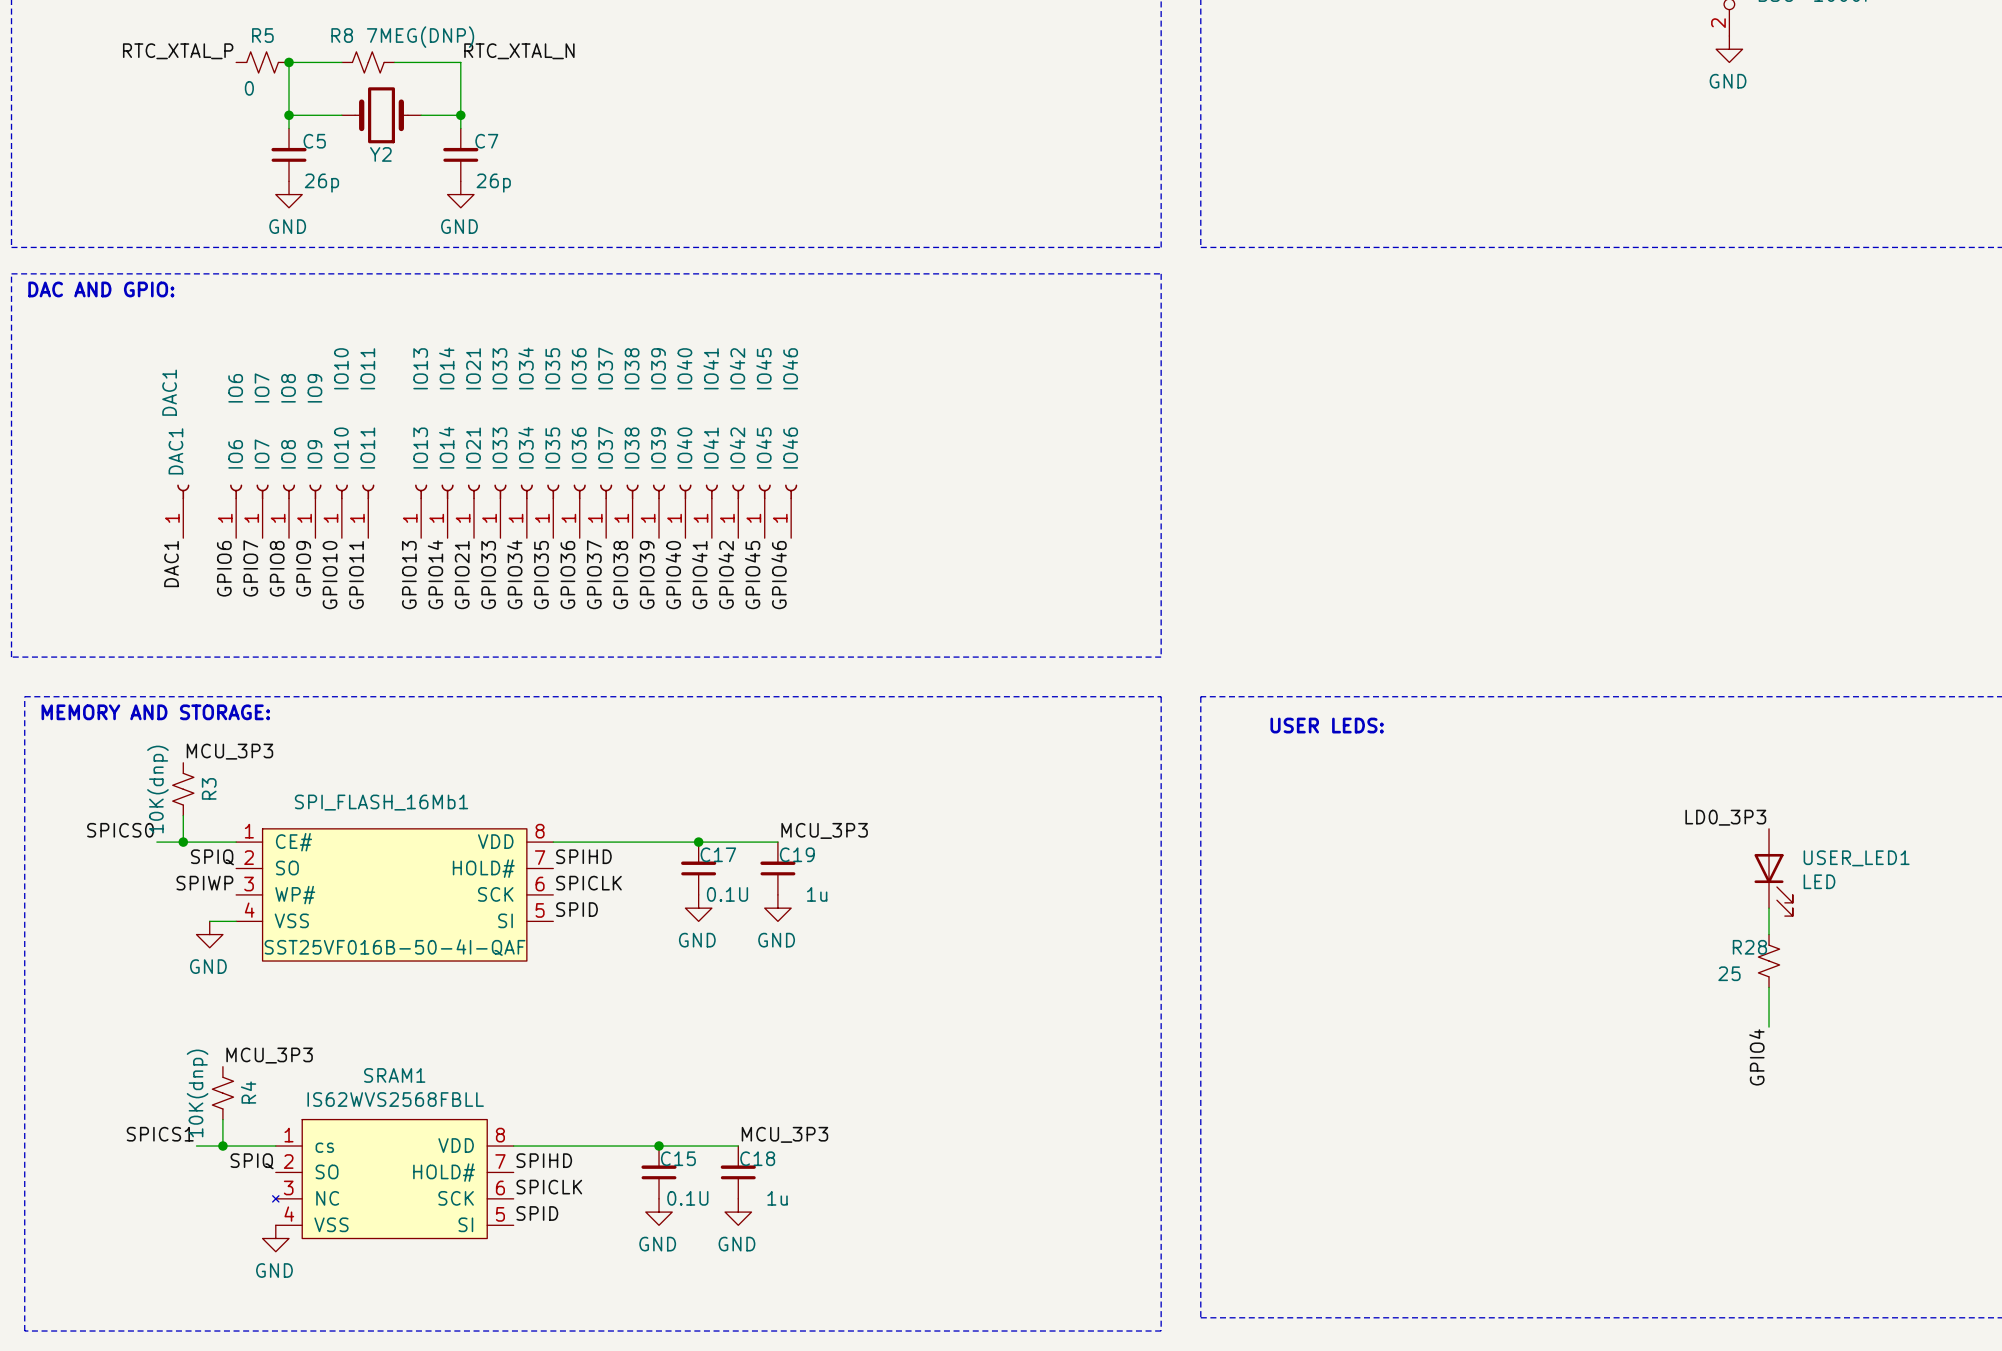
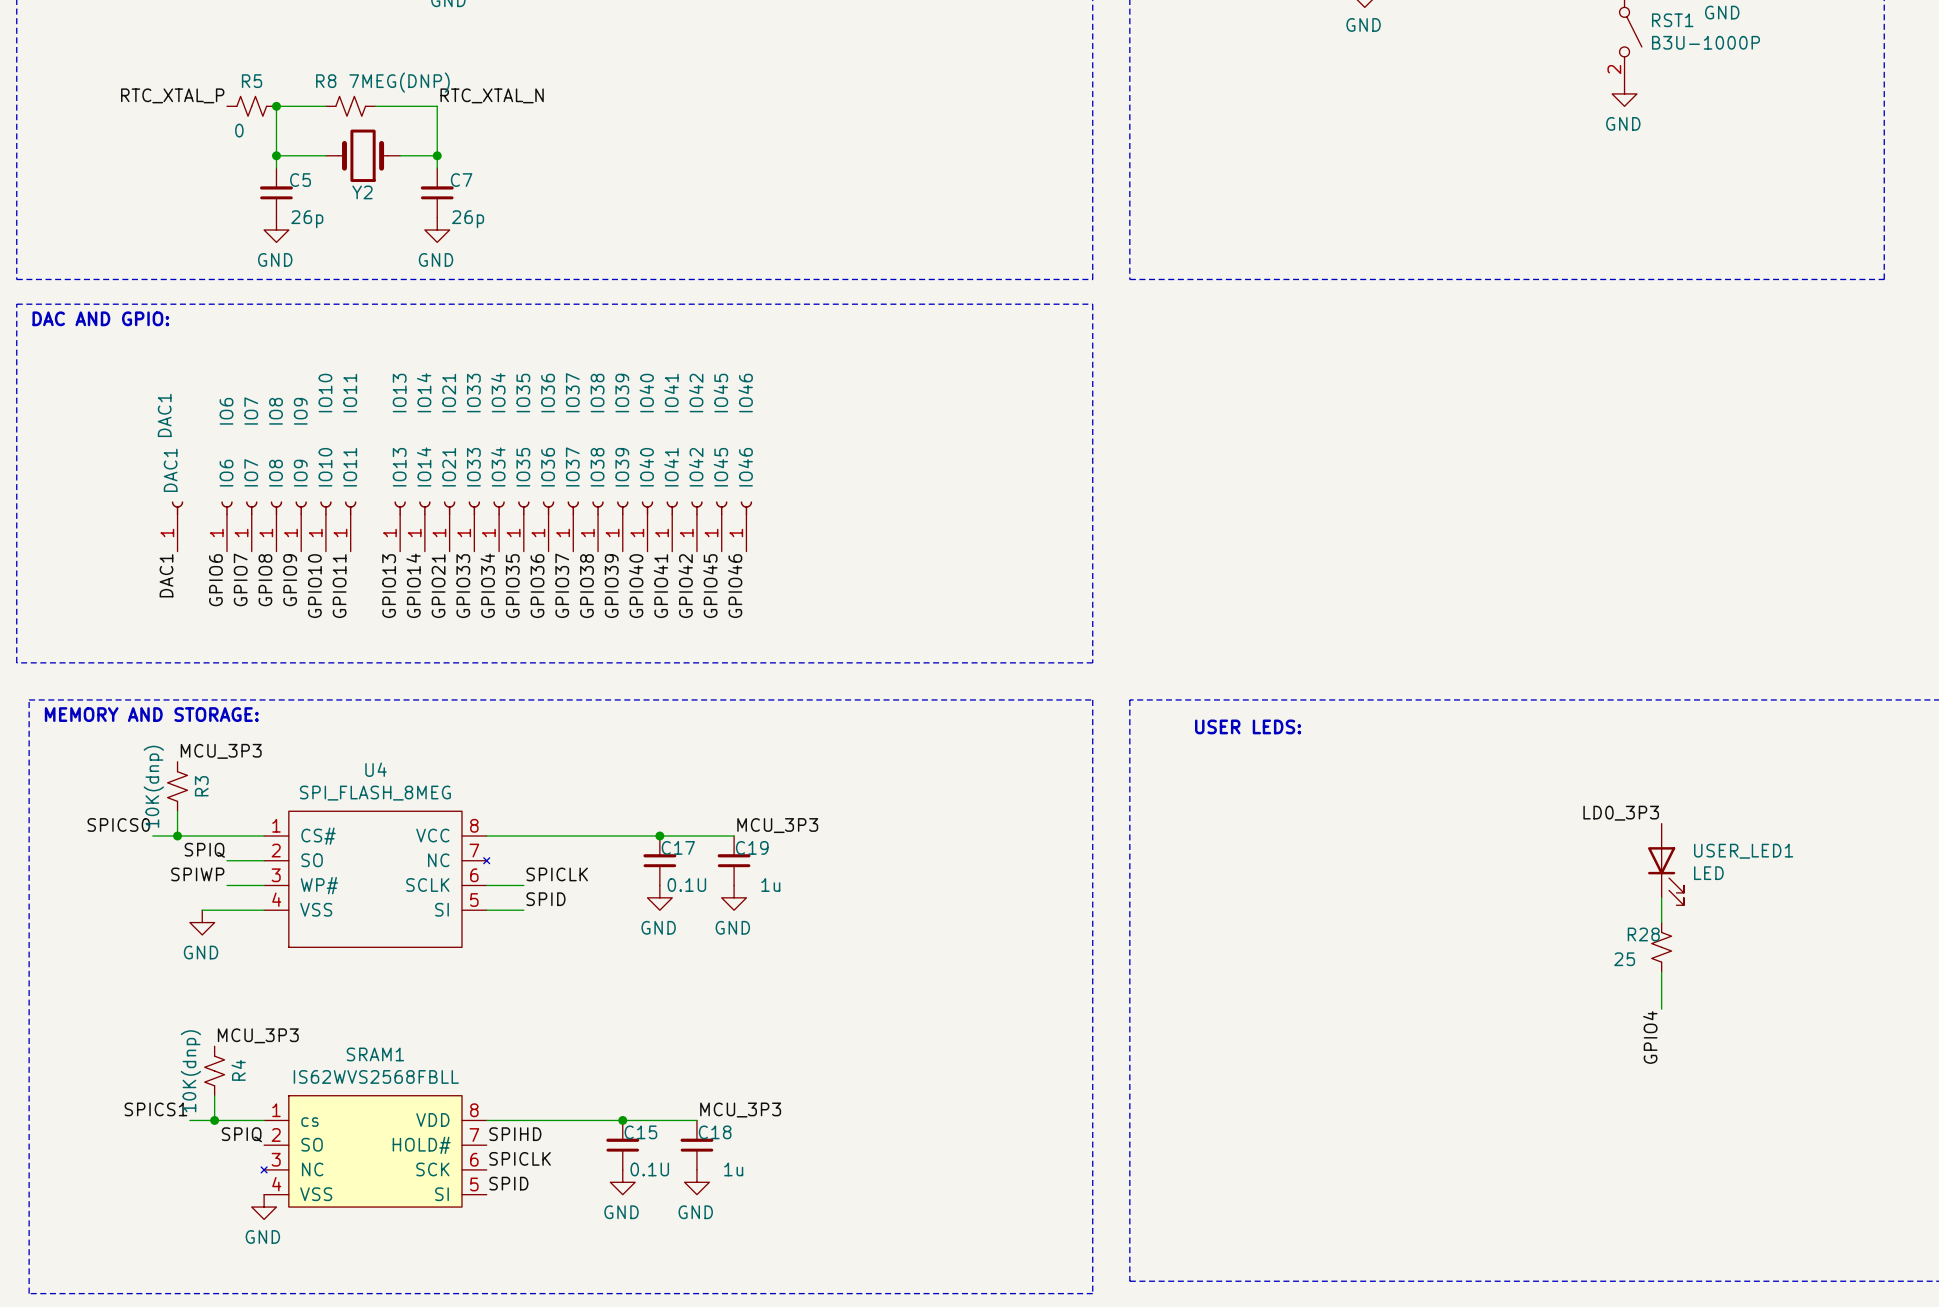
label: SPIHD (583, 856) -> none
U4: none -> SPI_FLASH_8MEG (376, 879)
SPI_FLASH_16Mb1: SST25VF016B-50-4I-QAF (394, 894) -> none

